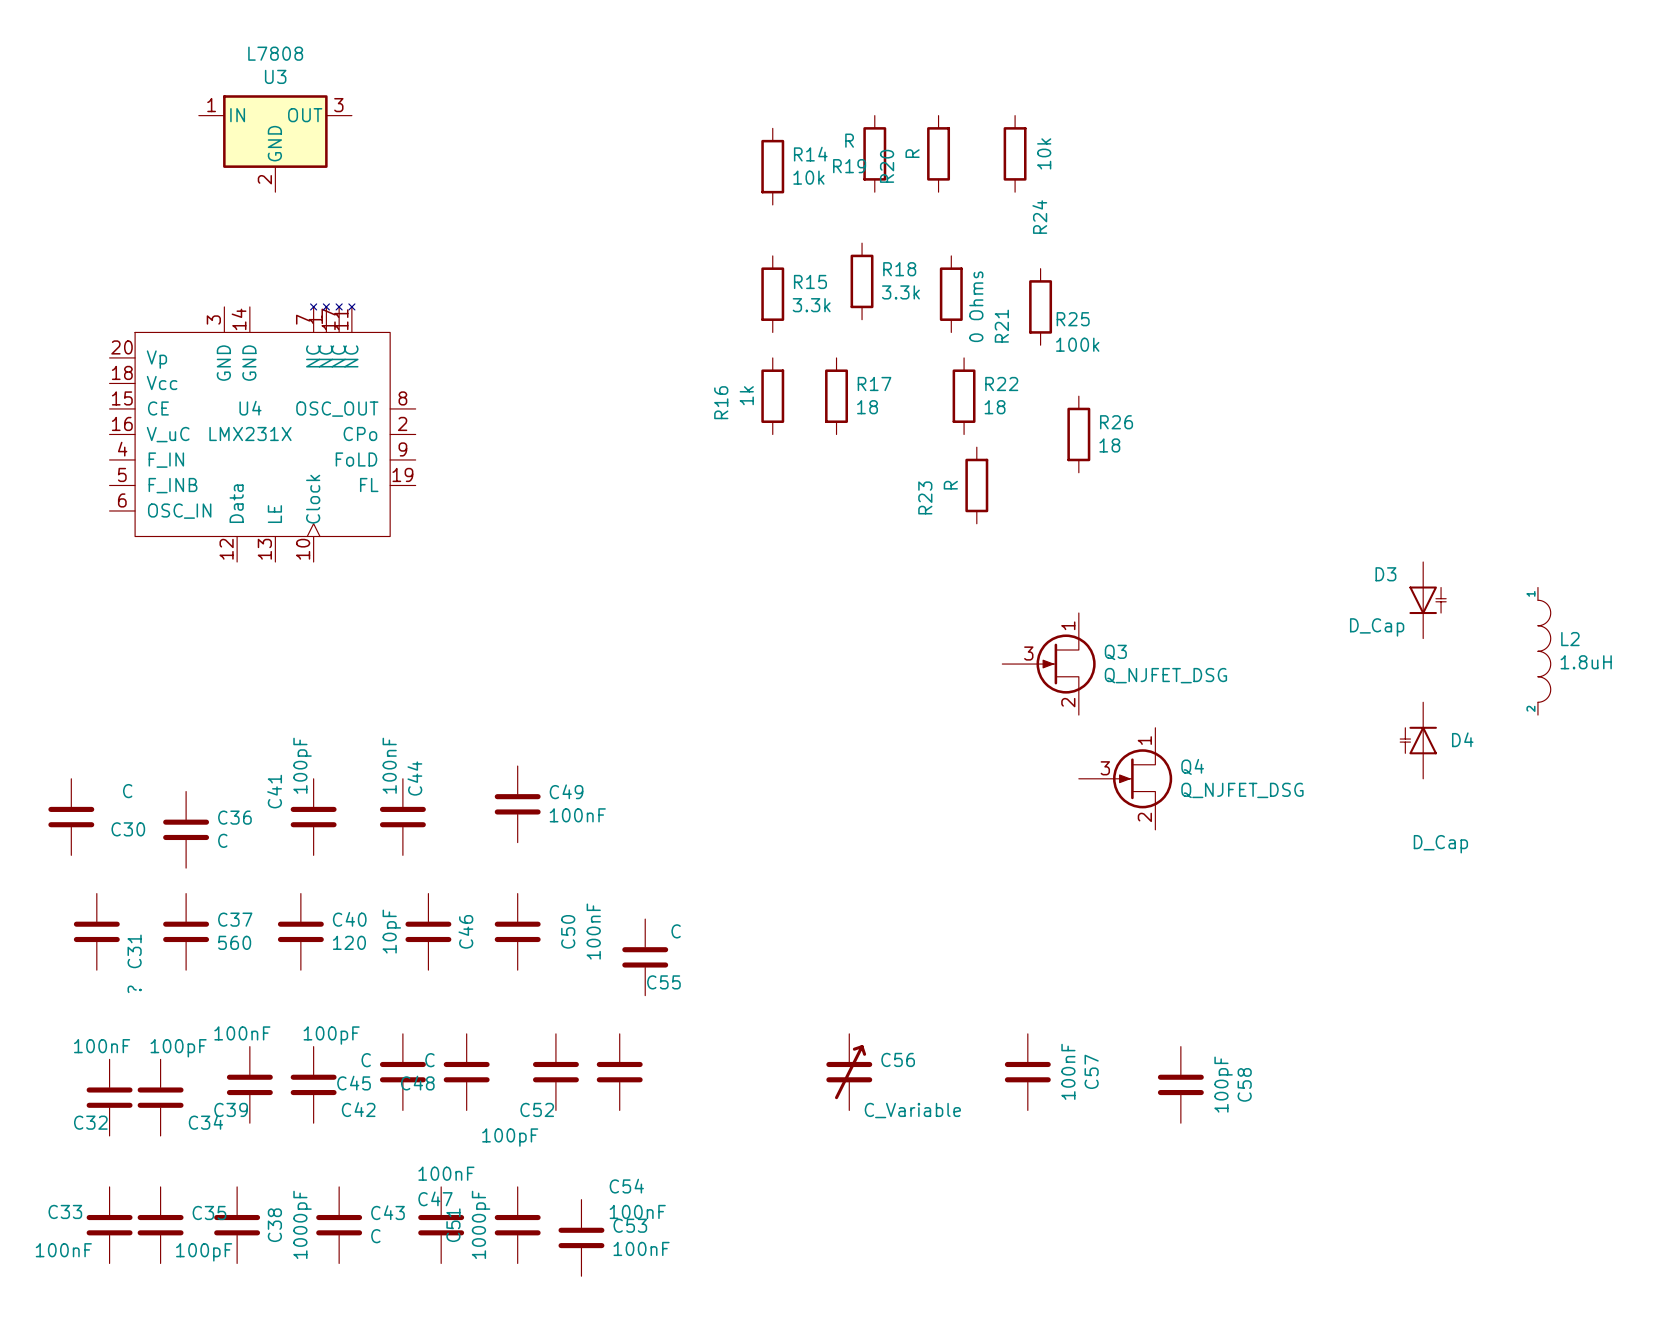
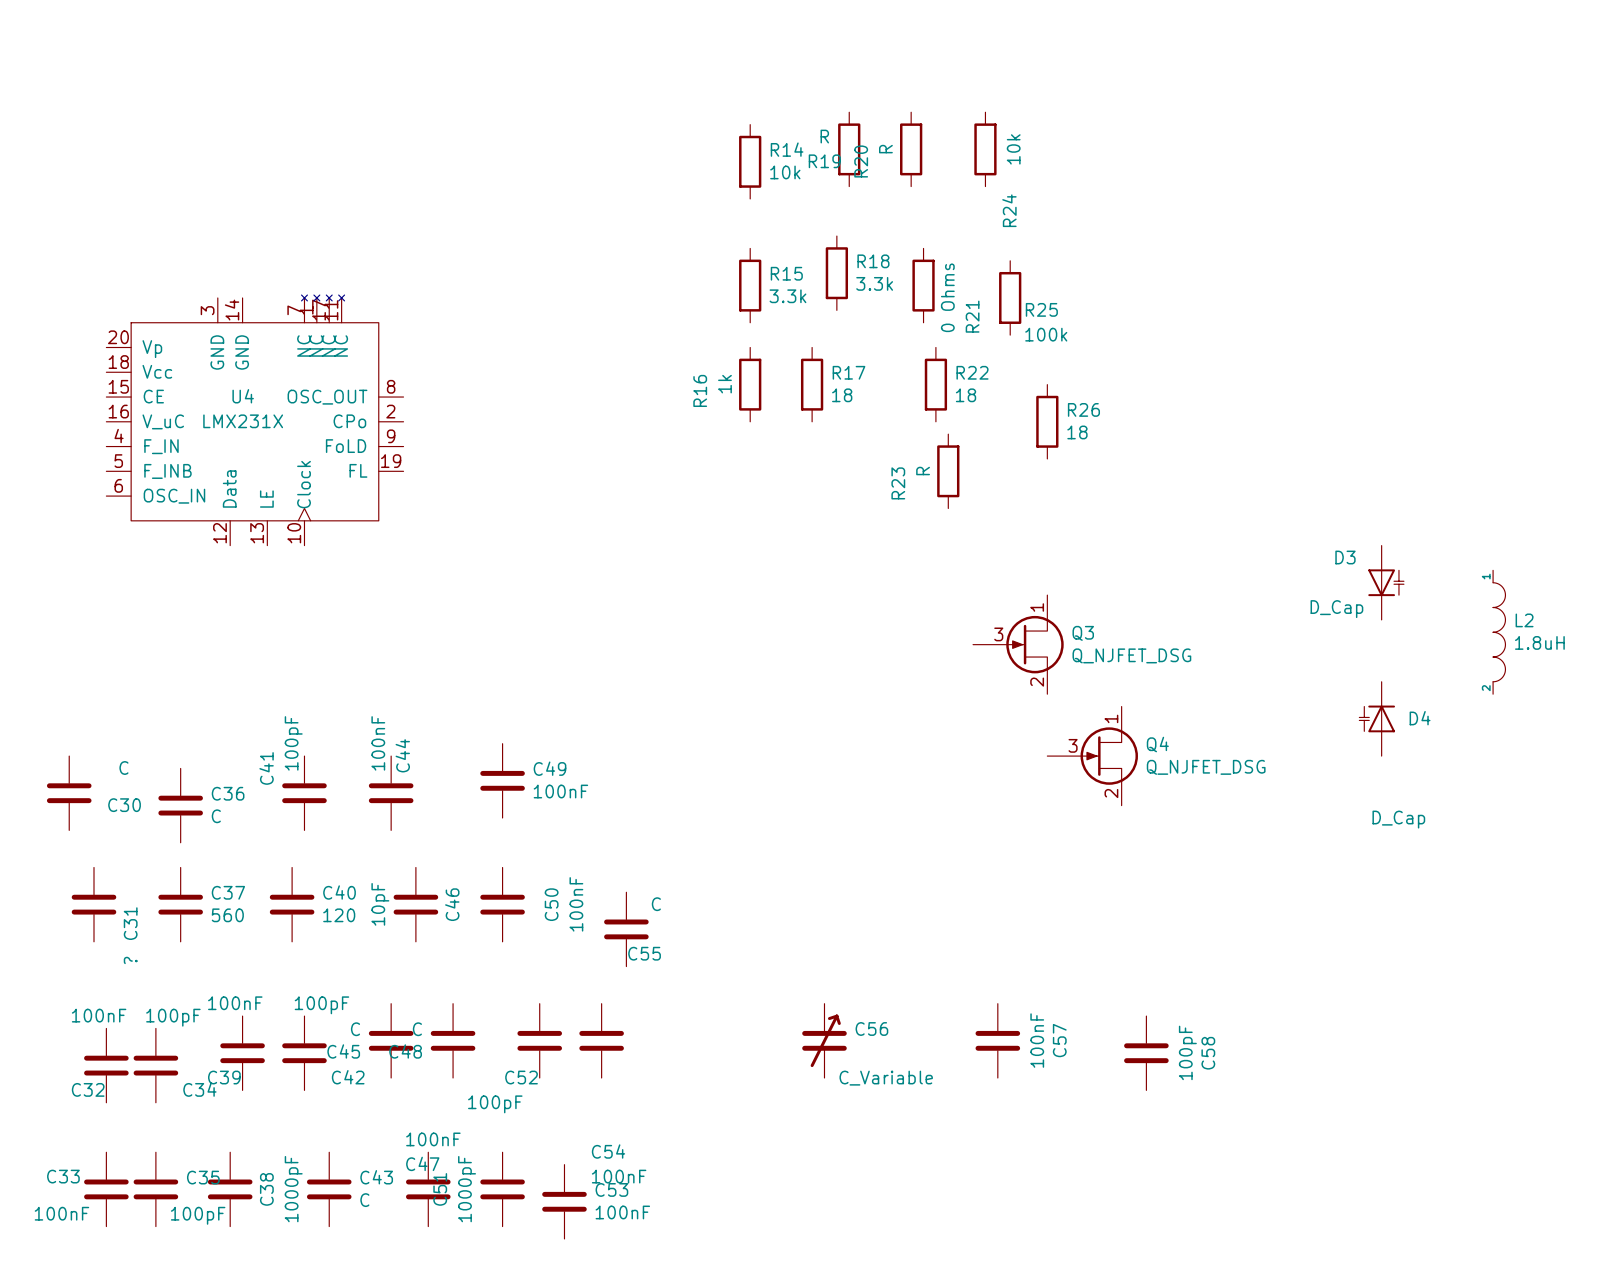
U3: L7808 (275, 143) -> none

